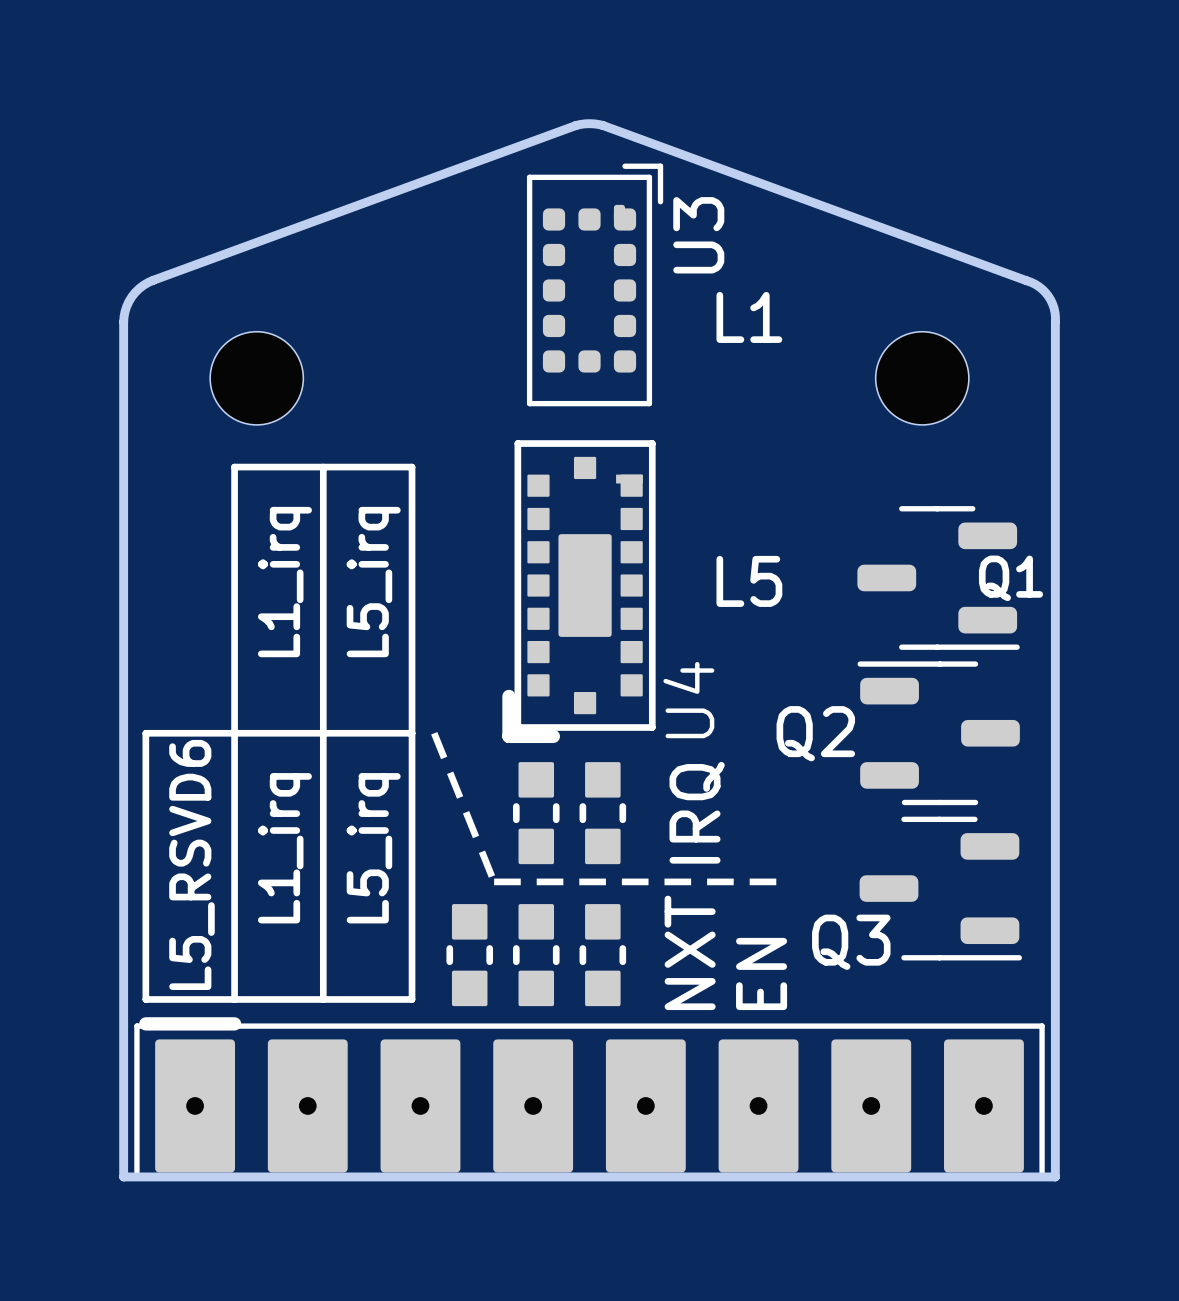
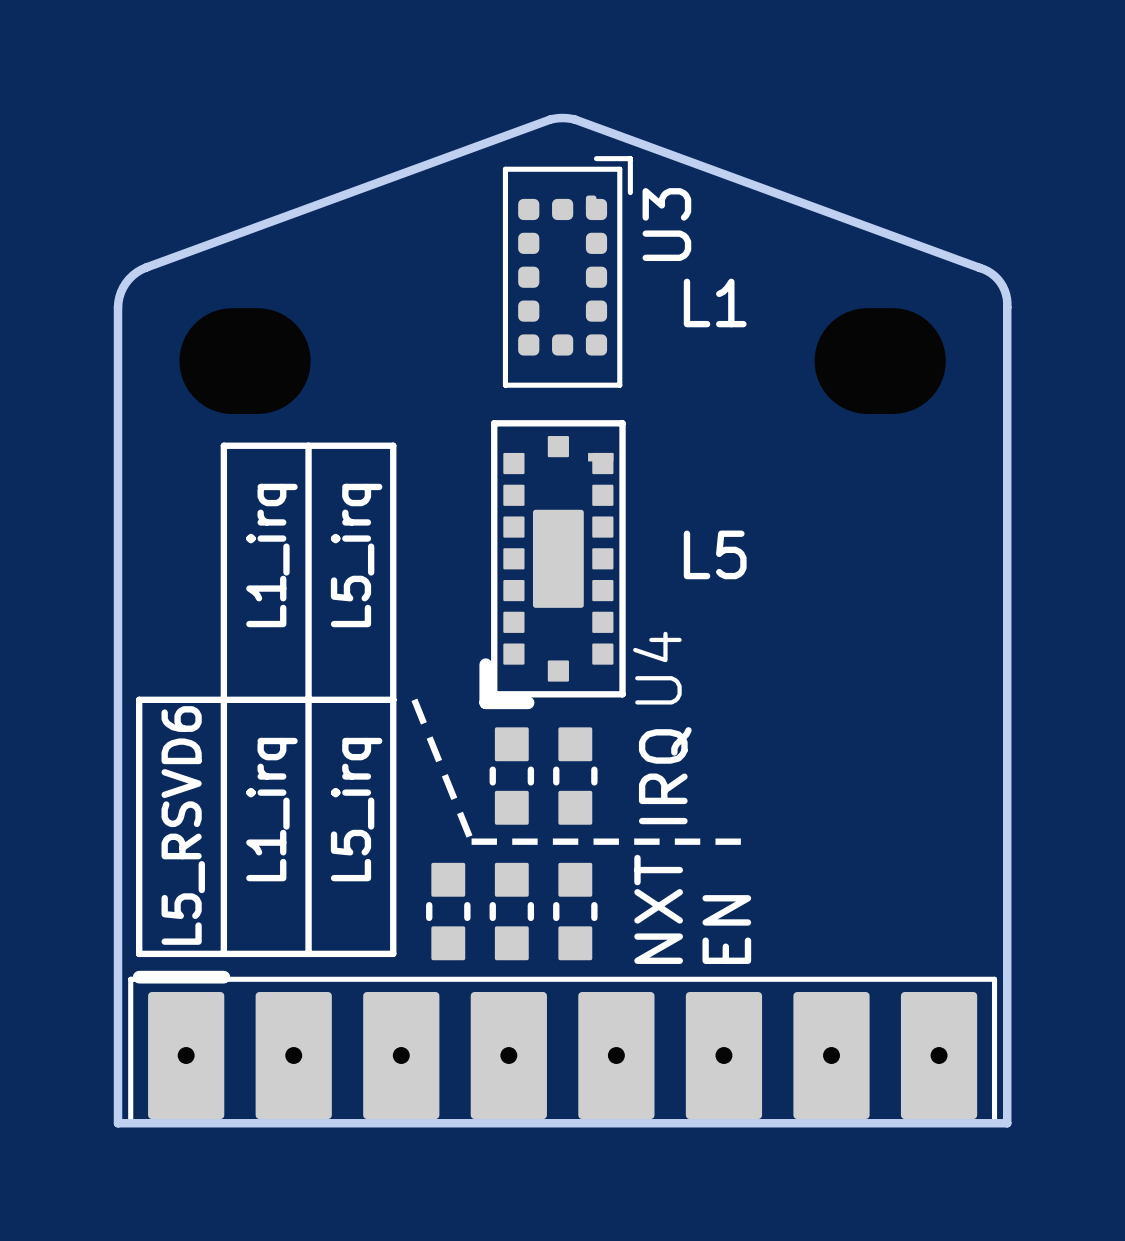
part footprint: [210, 331, 304, 425] -> [179, 308, 311, 415]
part footprint: [875, 331, 969, 425] -> [814, 308, 946, 415]
Q1: (938, 577) -> none
Q2: (938, 733) -> none
Q3: (940, 888) -> none

